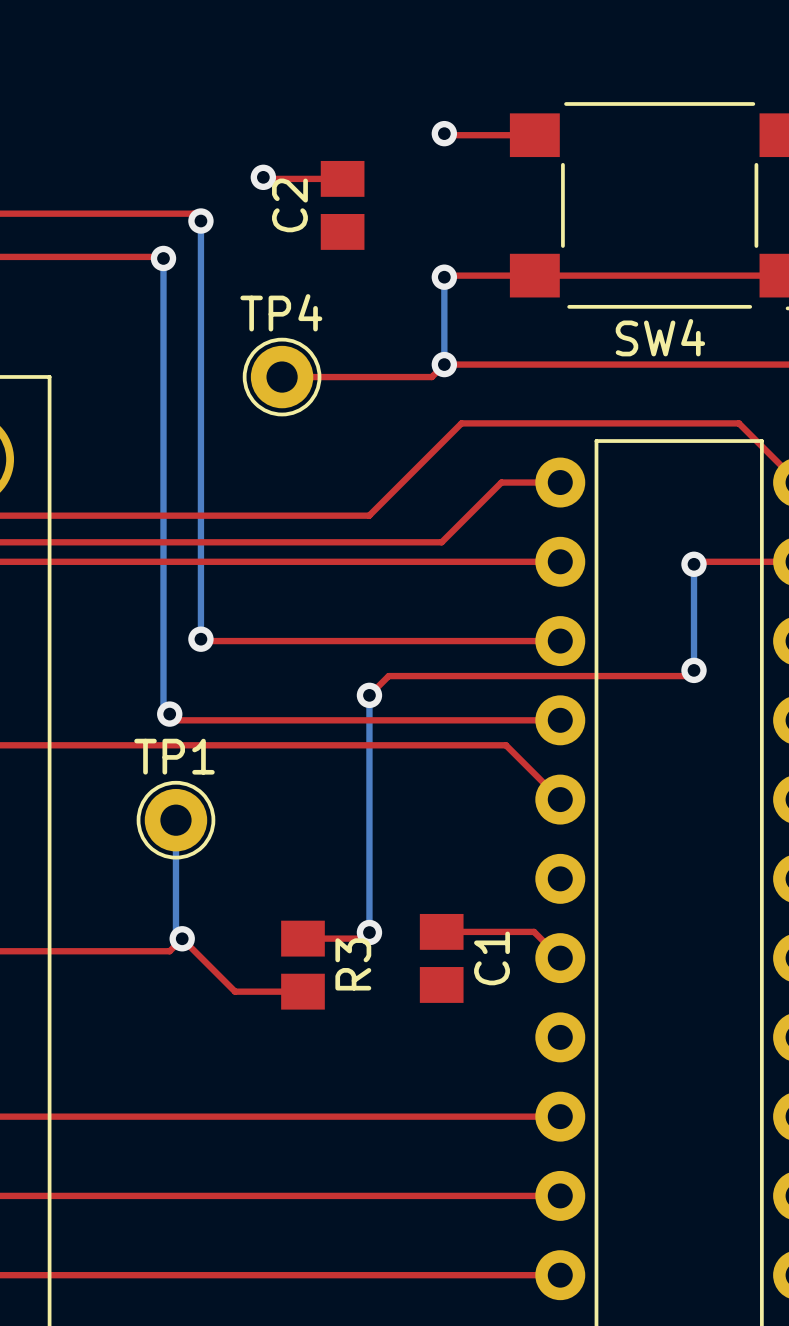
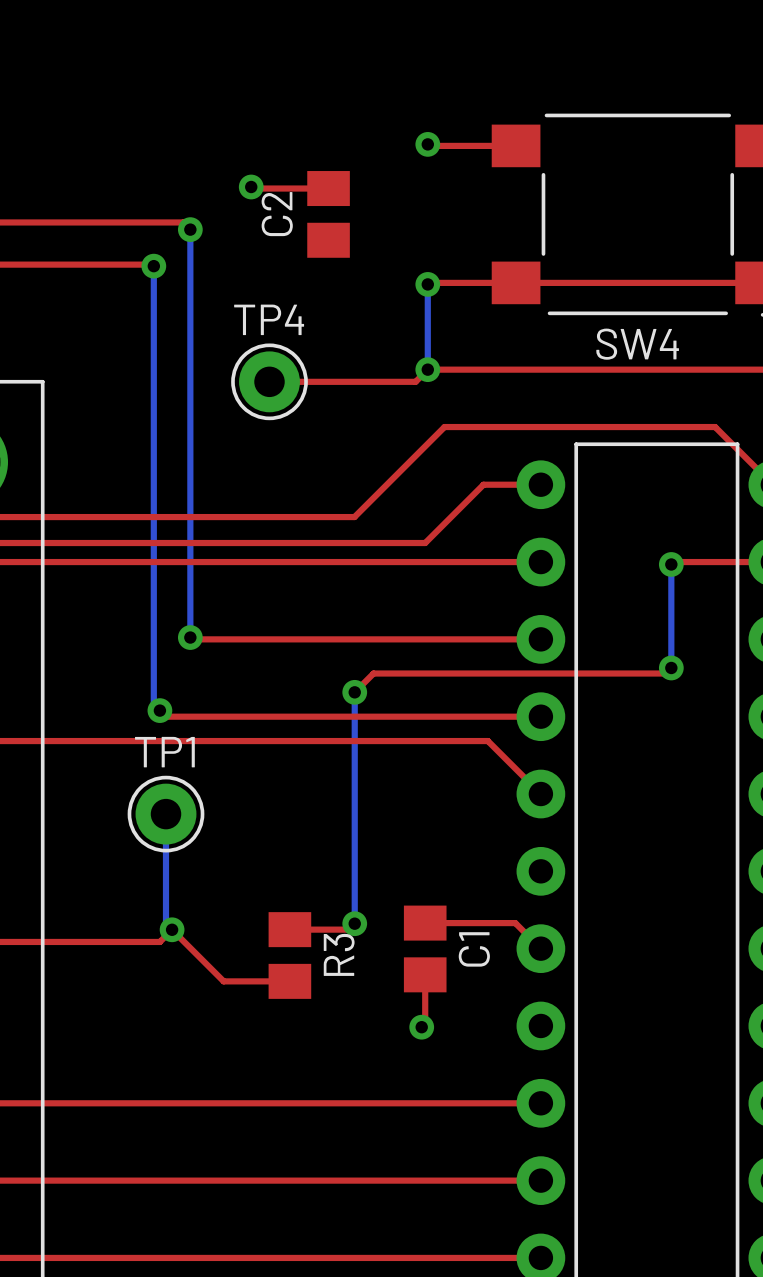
top track: none -> (425, 974) (425, 1023) (421, 1027)
via: none -> (421, 1027)

